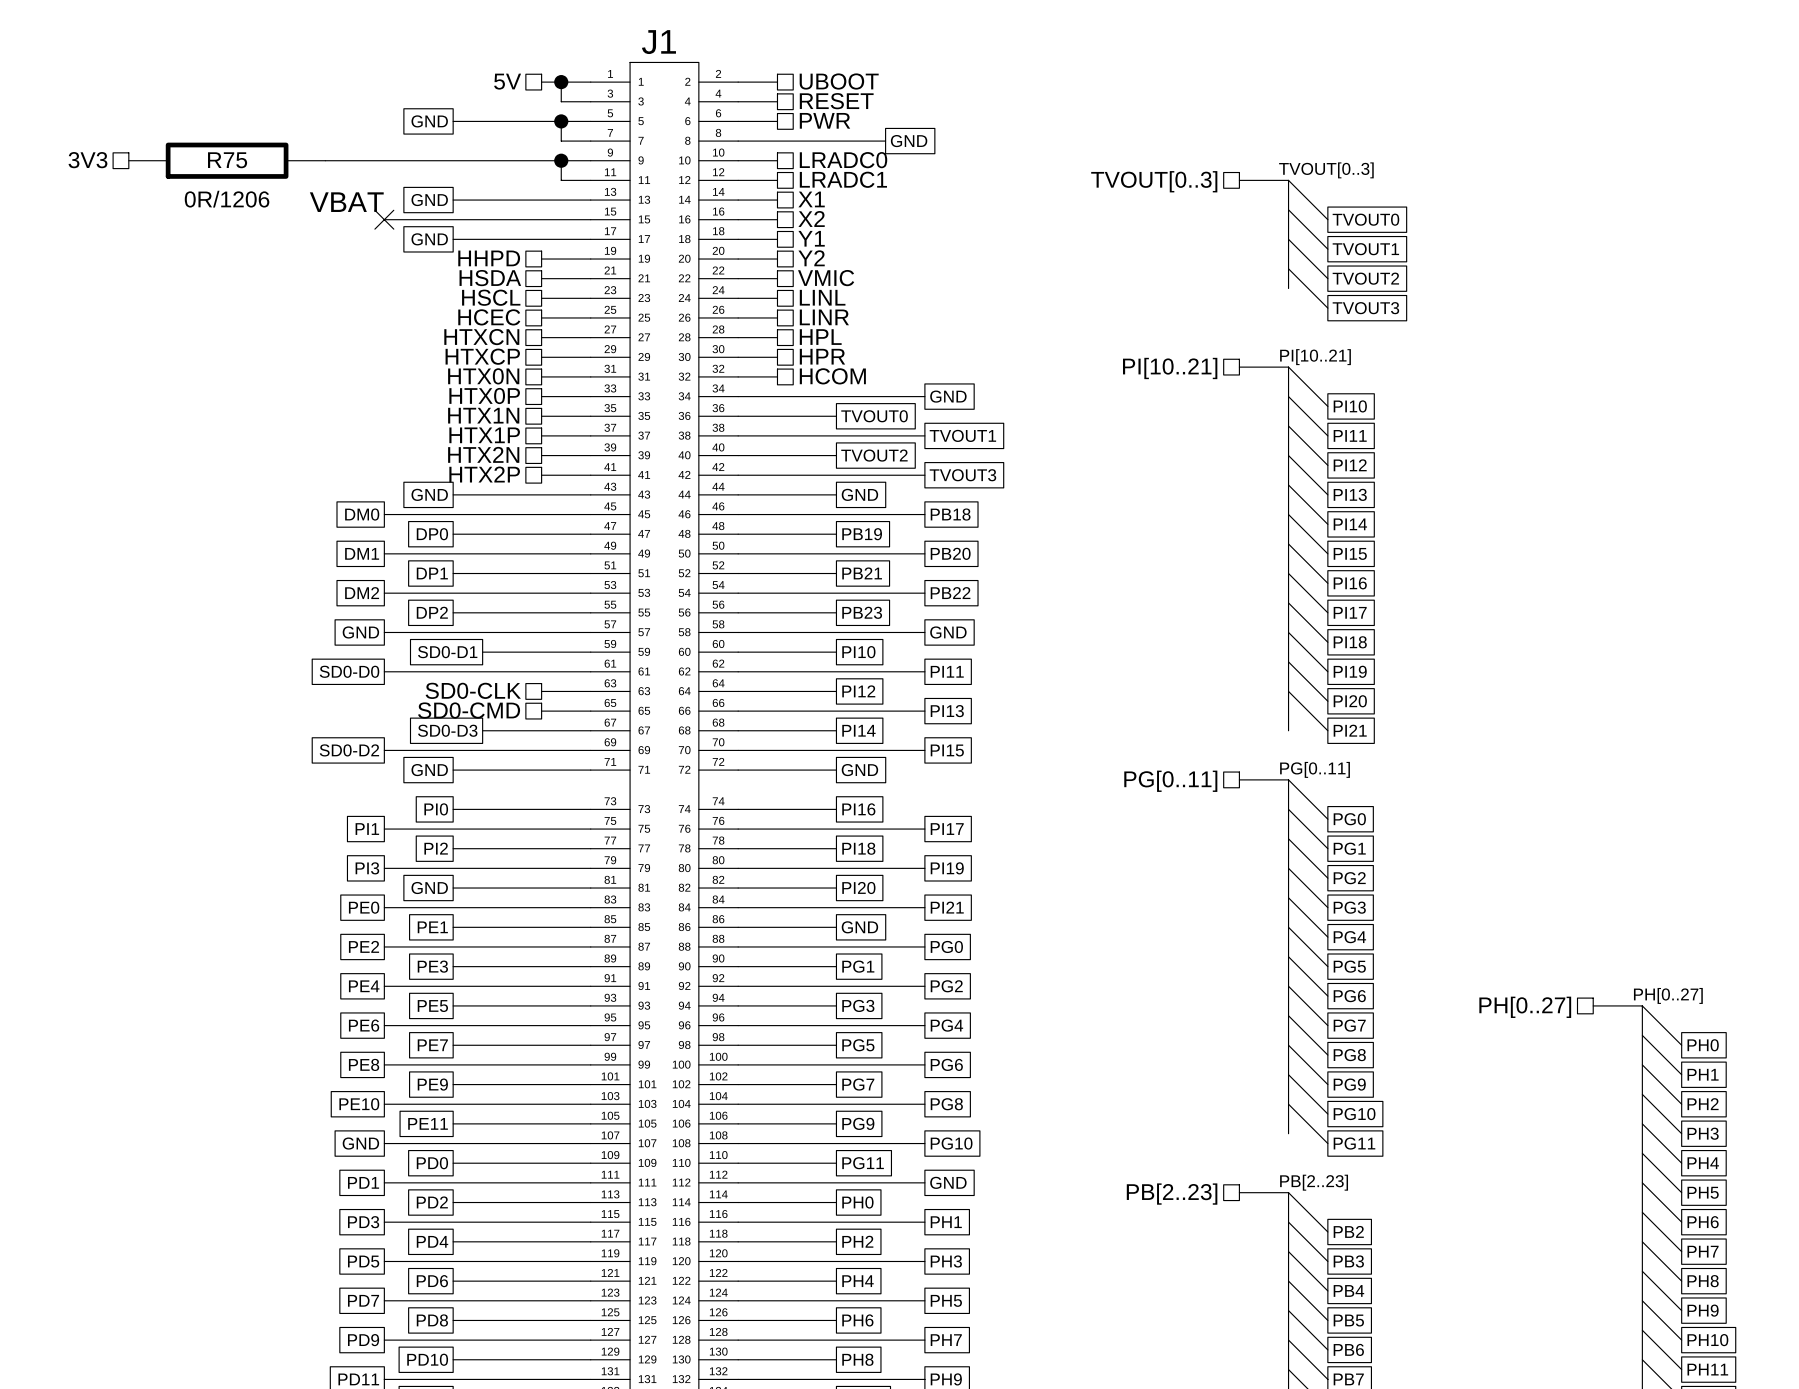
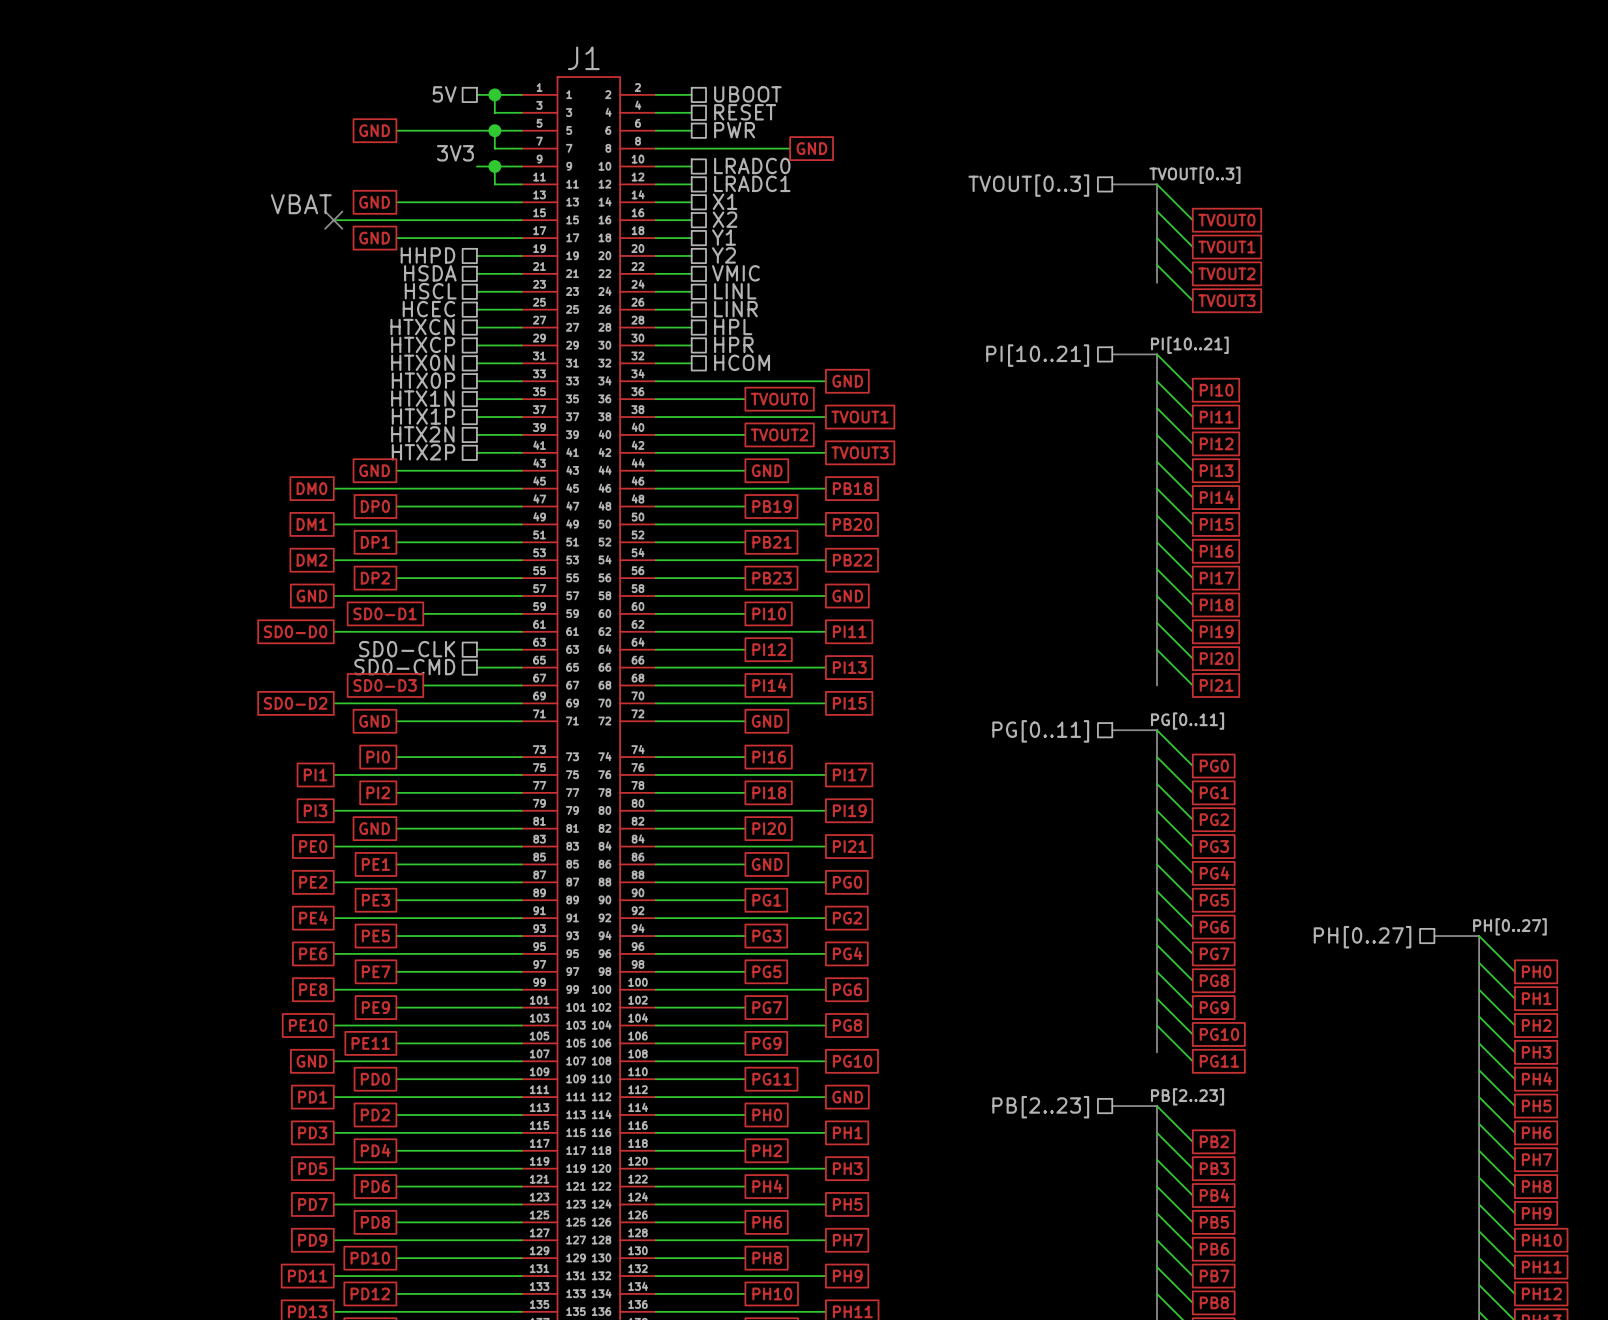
label: none -> 3V3 (455, 153)
hierarchical label: 3V3 (87, 160) -> none
R75: 0R/1206 (227, 160) -> none
wire: (325, 160) (541, 160) -> none

